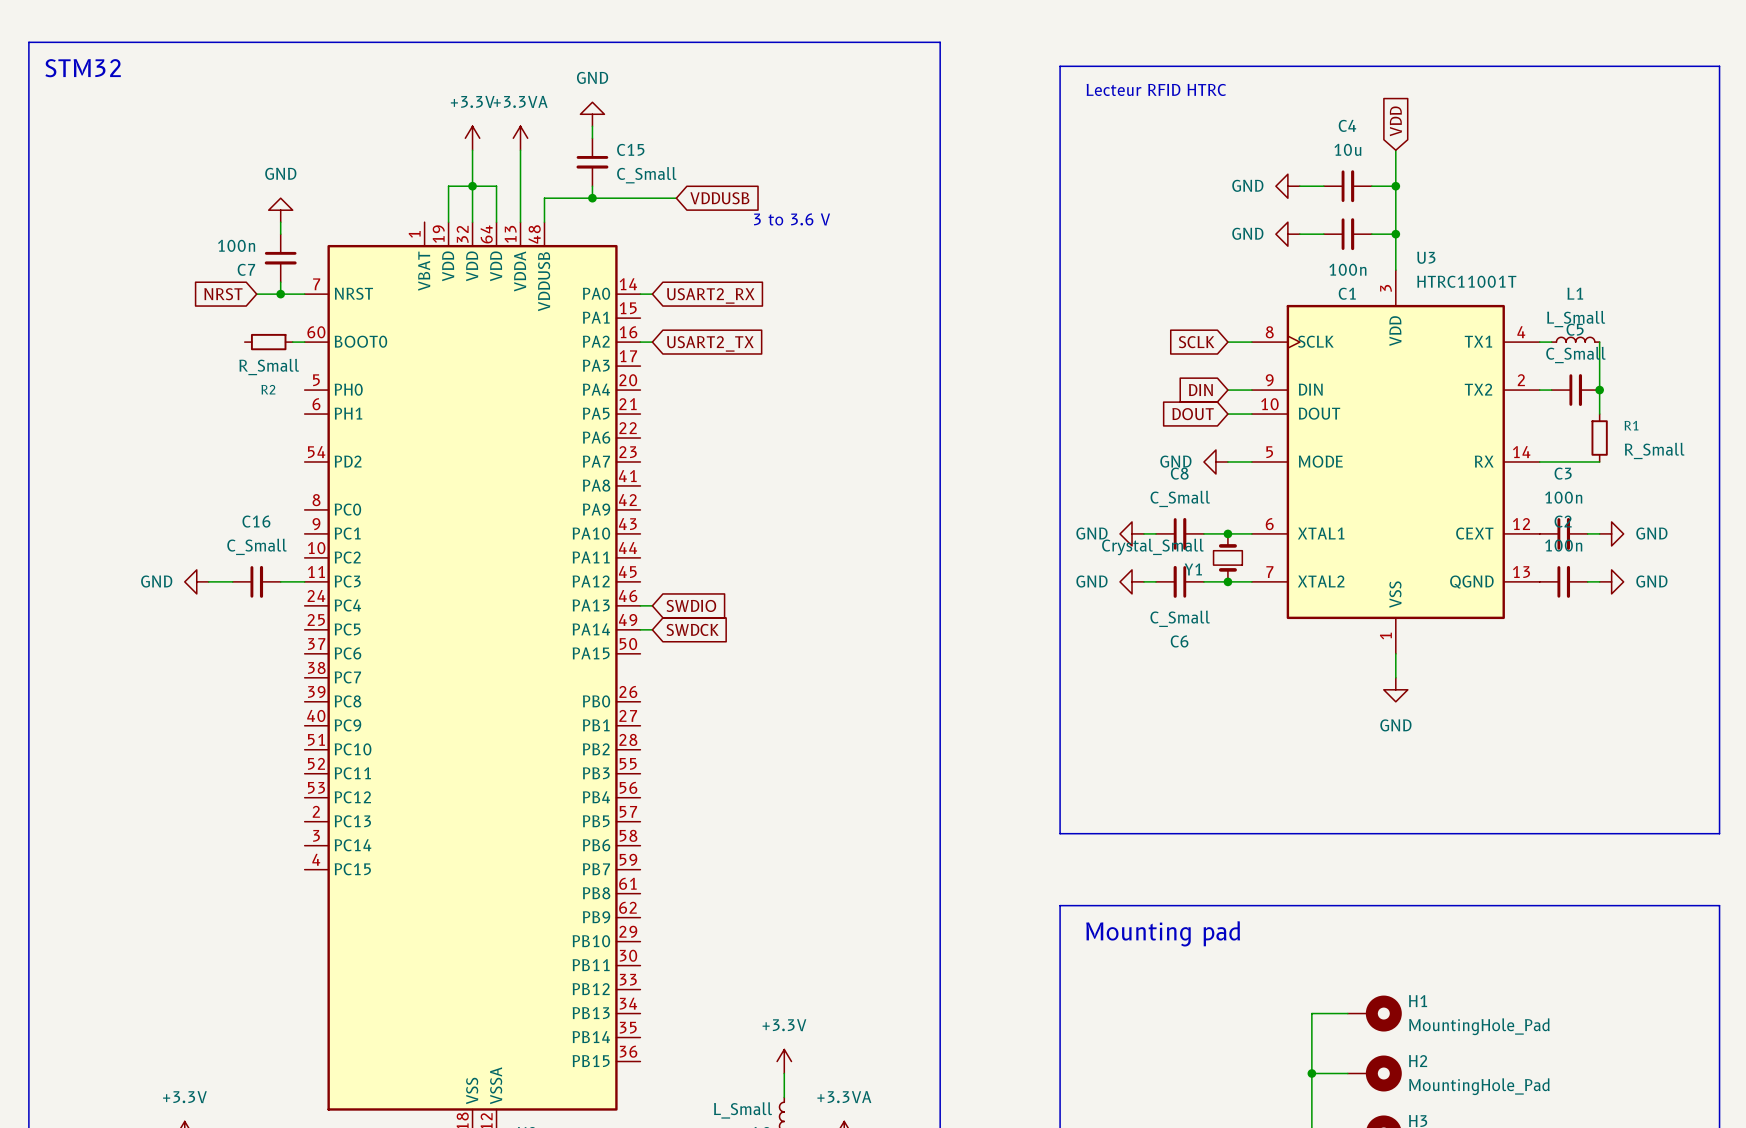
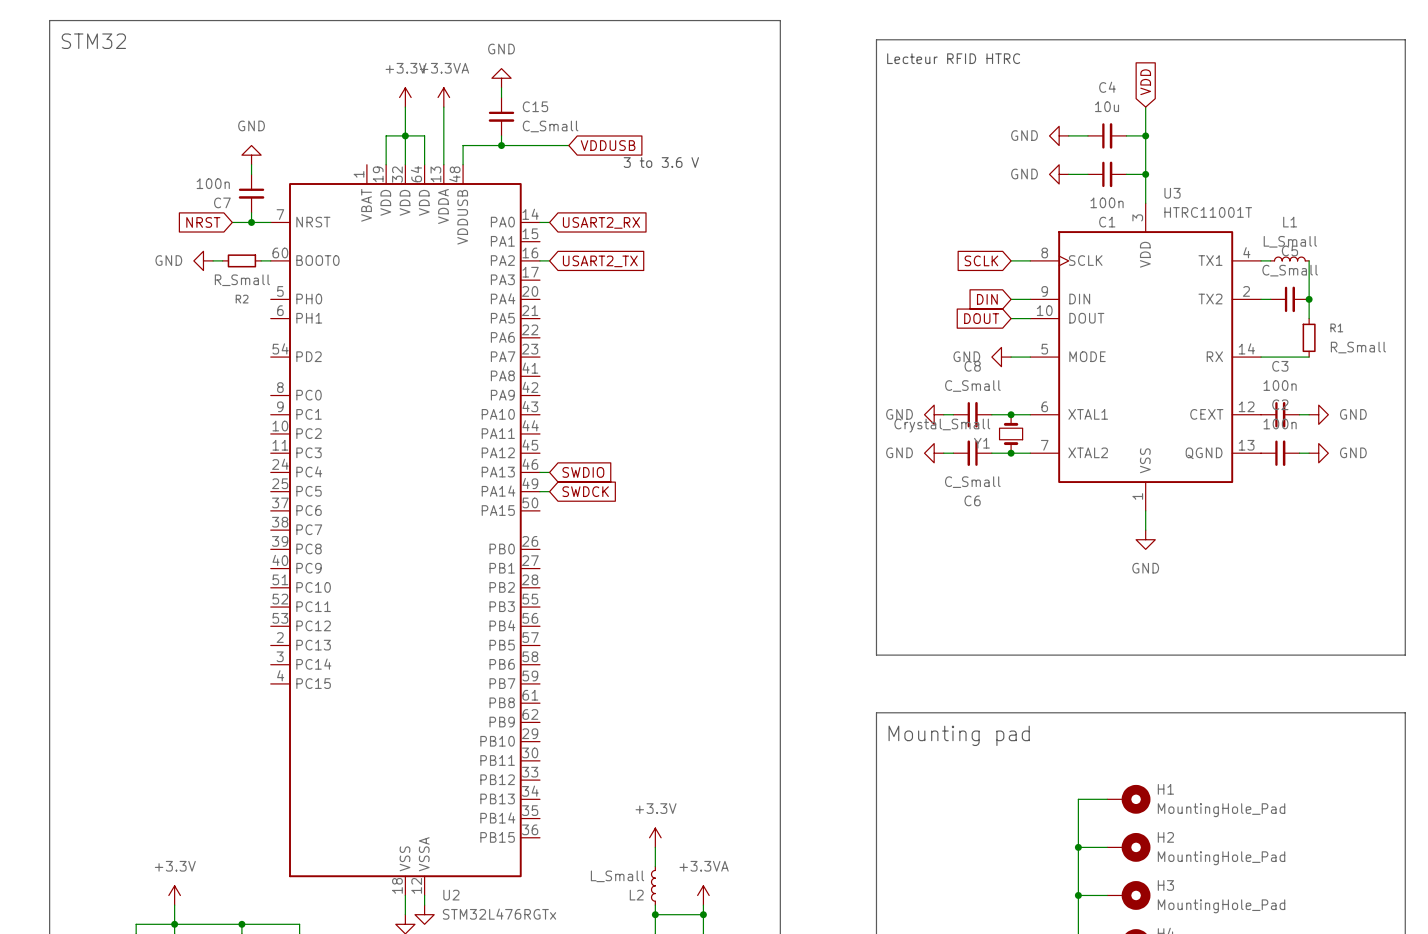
power symbol: none -> GND (203, 260)
wire: none -> (213, 260) (222, 260)
power symbol: GND (196, 581) -> none
wire: (208, 581) (232, 581) -> none
C16: C_Small (256, 581) -> none
wire: (280, 581) (304, 581) -> none

